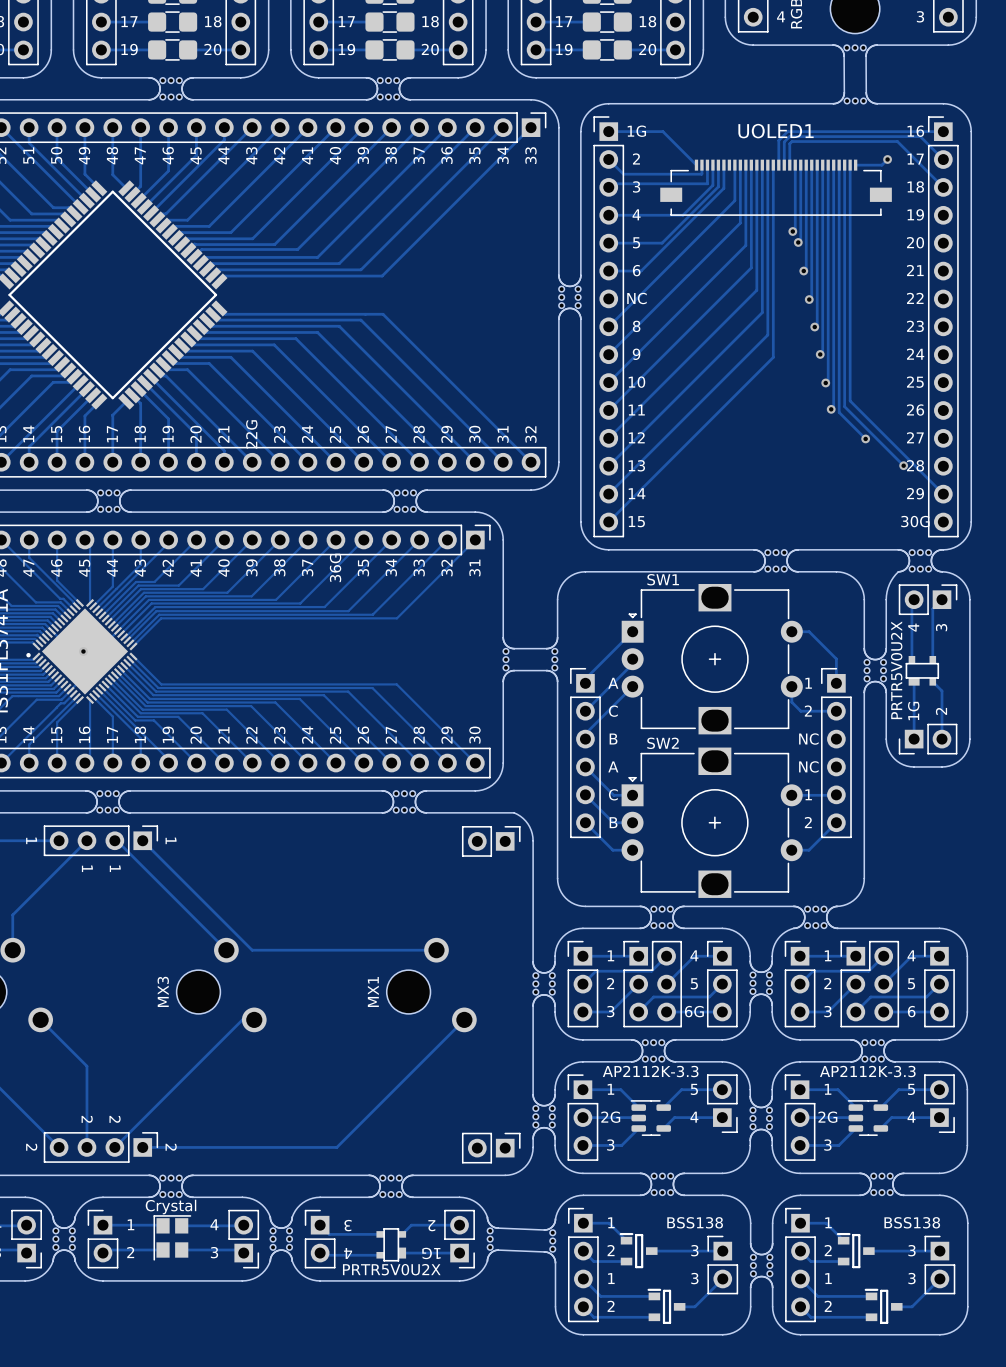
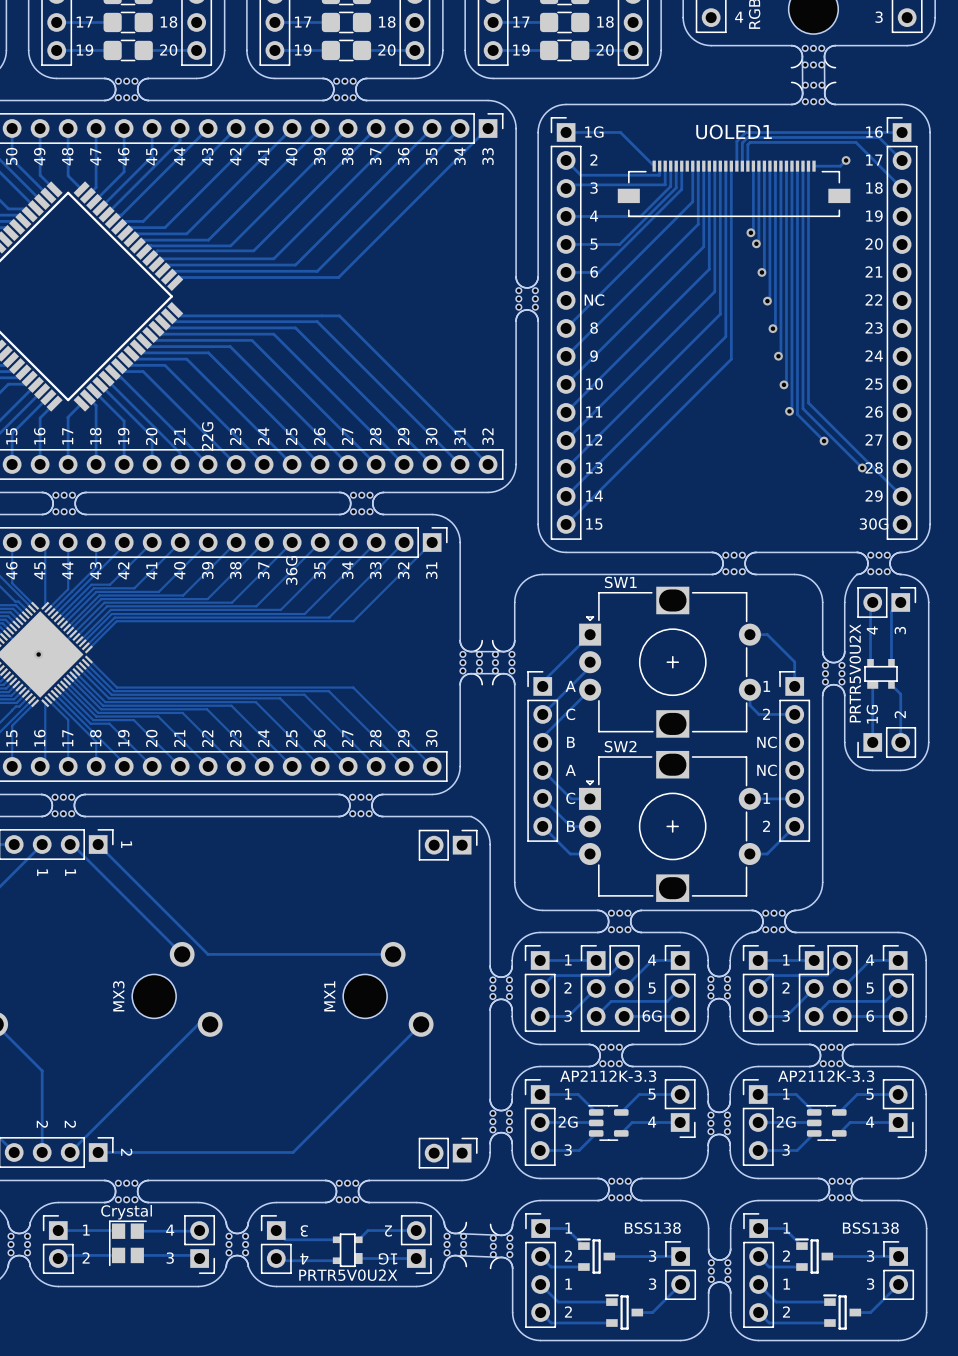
part footprint: [832, 44, 878, 57] -> [790, 45, 837, 69]
part footprint: [832, 92, 878, 105] -> [791, 81, 837, 106]
part footprint: [502, 637, 515, 683] -> [459, 640, 483, 686]
part footprint: [546, 637, 559, 683] -> [492, 640, 516, 686]
part footprint: [486, 1216, 499, 1262] -> [443, 1221, 467, 1268]
part footprint: [543, 1218, 557, 1264] -> [490, 1223, 514, 1269]

